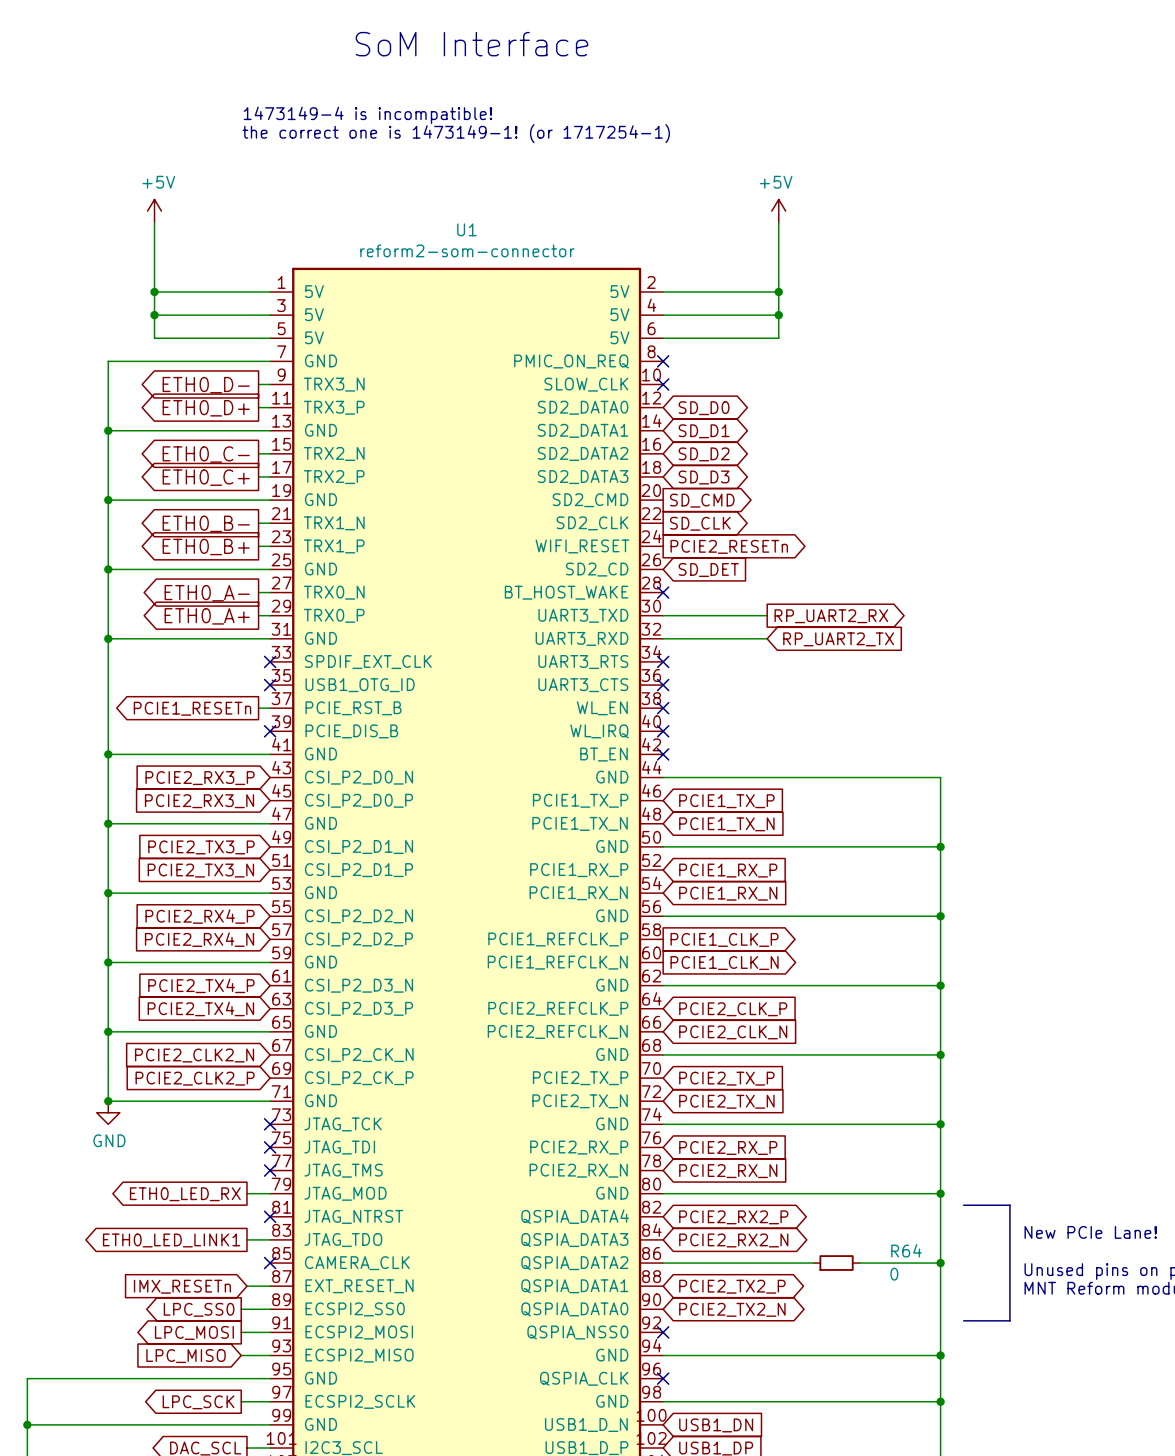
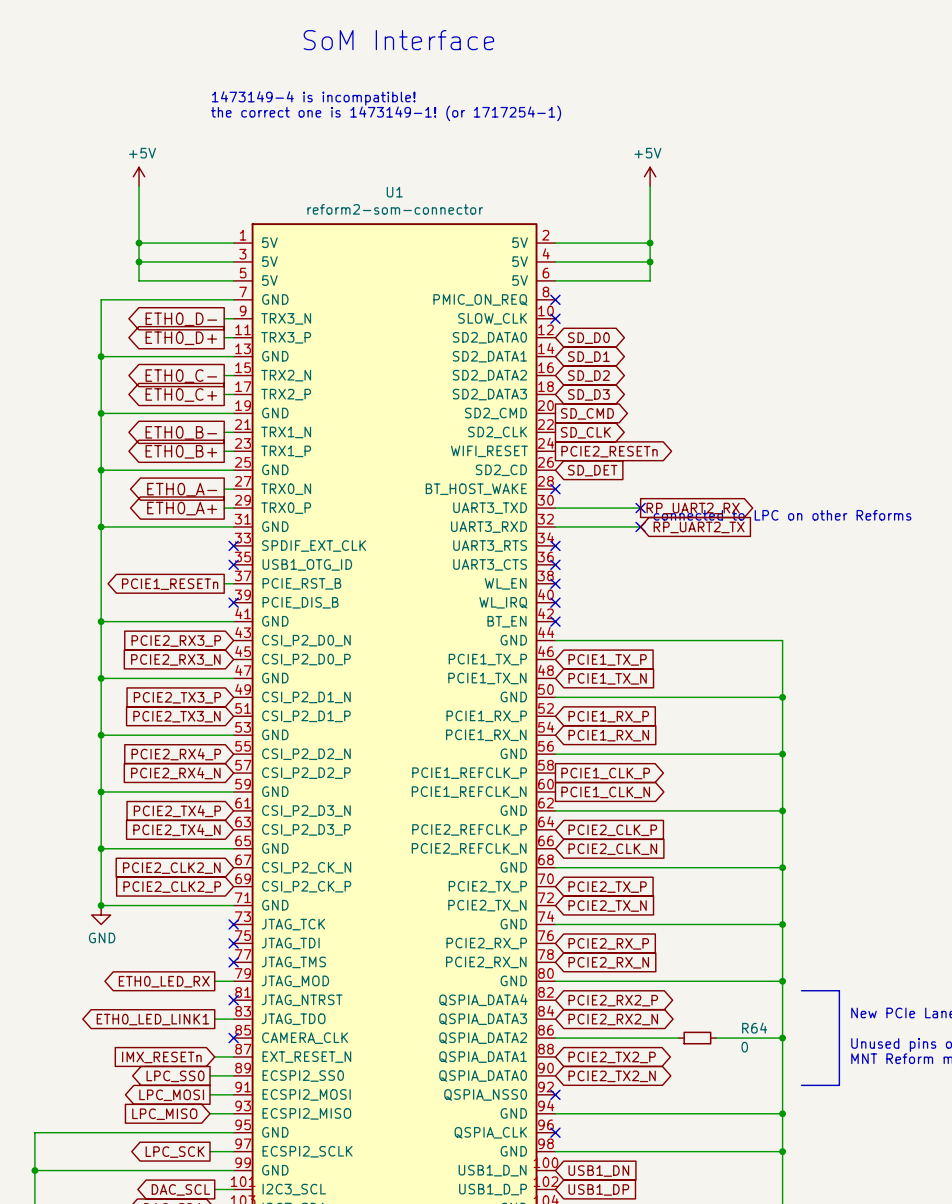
no-connect mark: none -> (640, 508)
text: none -> connected to LPC on other Reforms (782, 515)
no-connect mark: none -> (640, 526)

